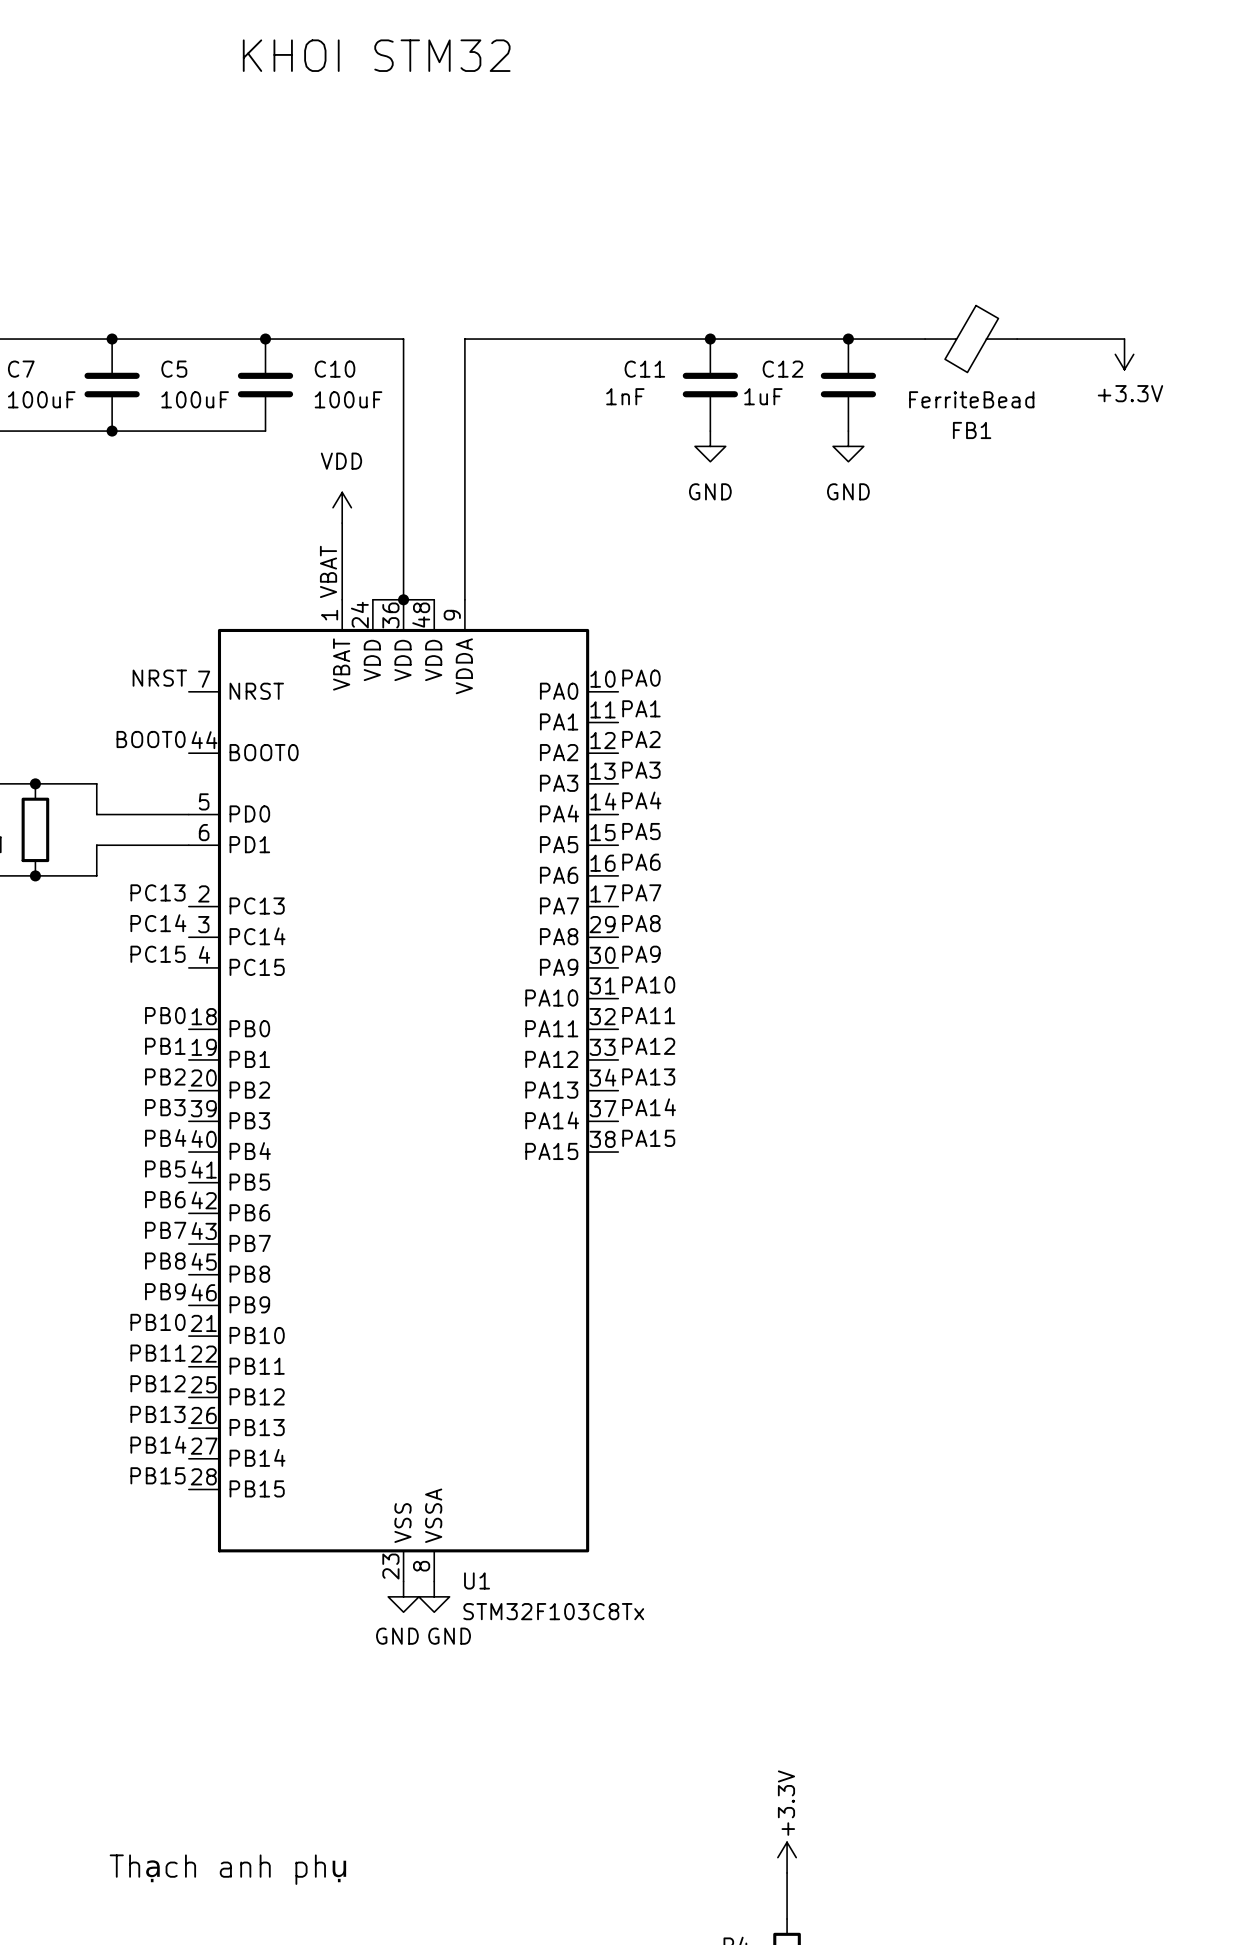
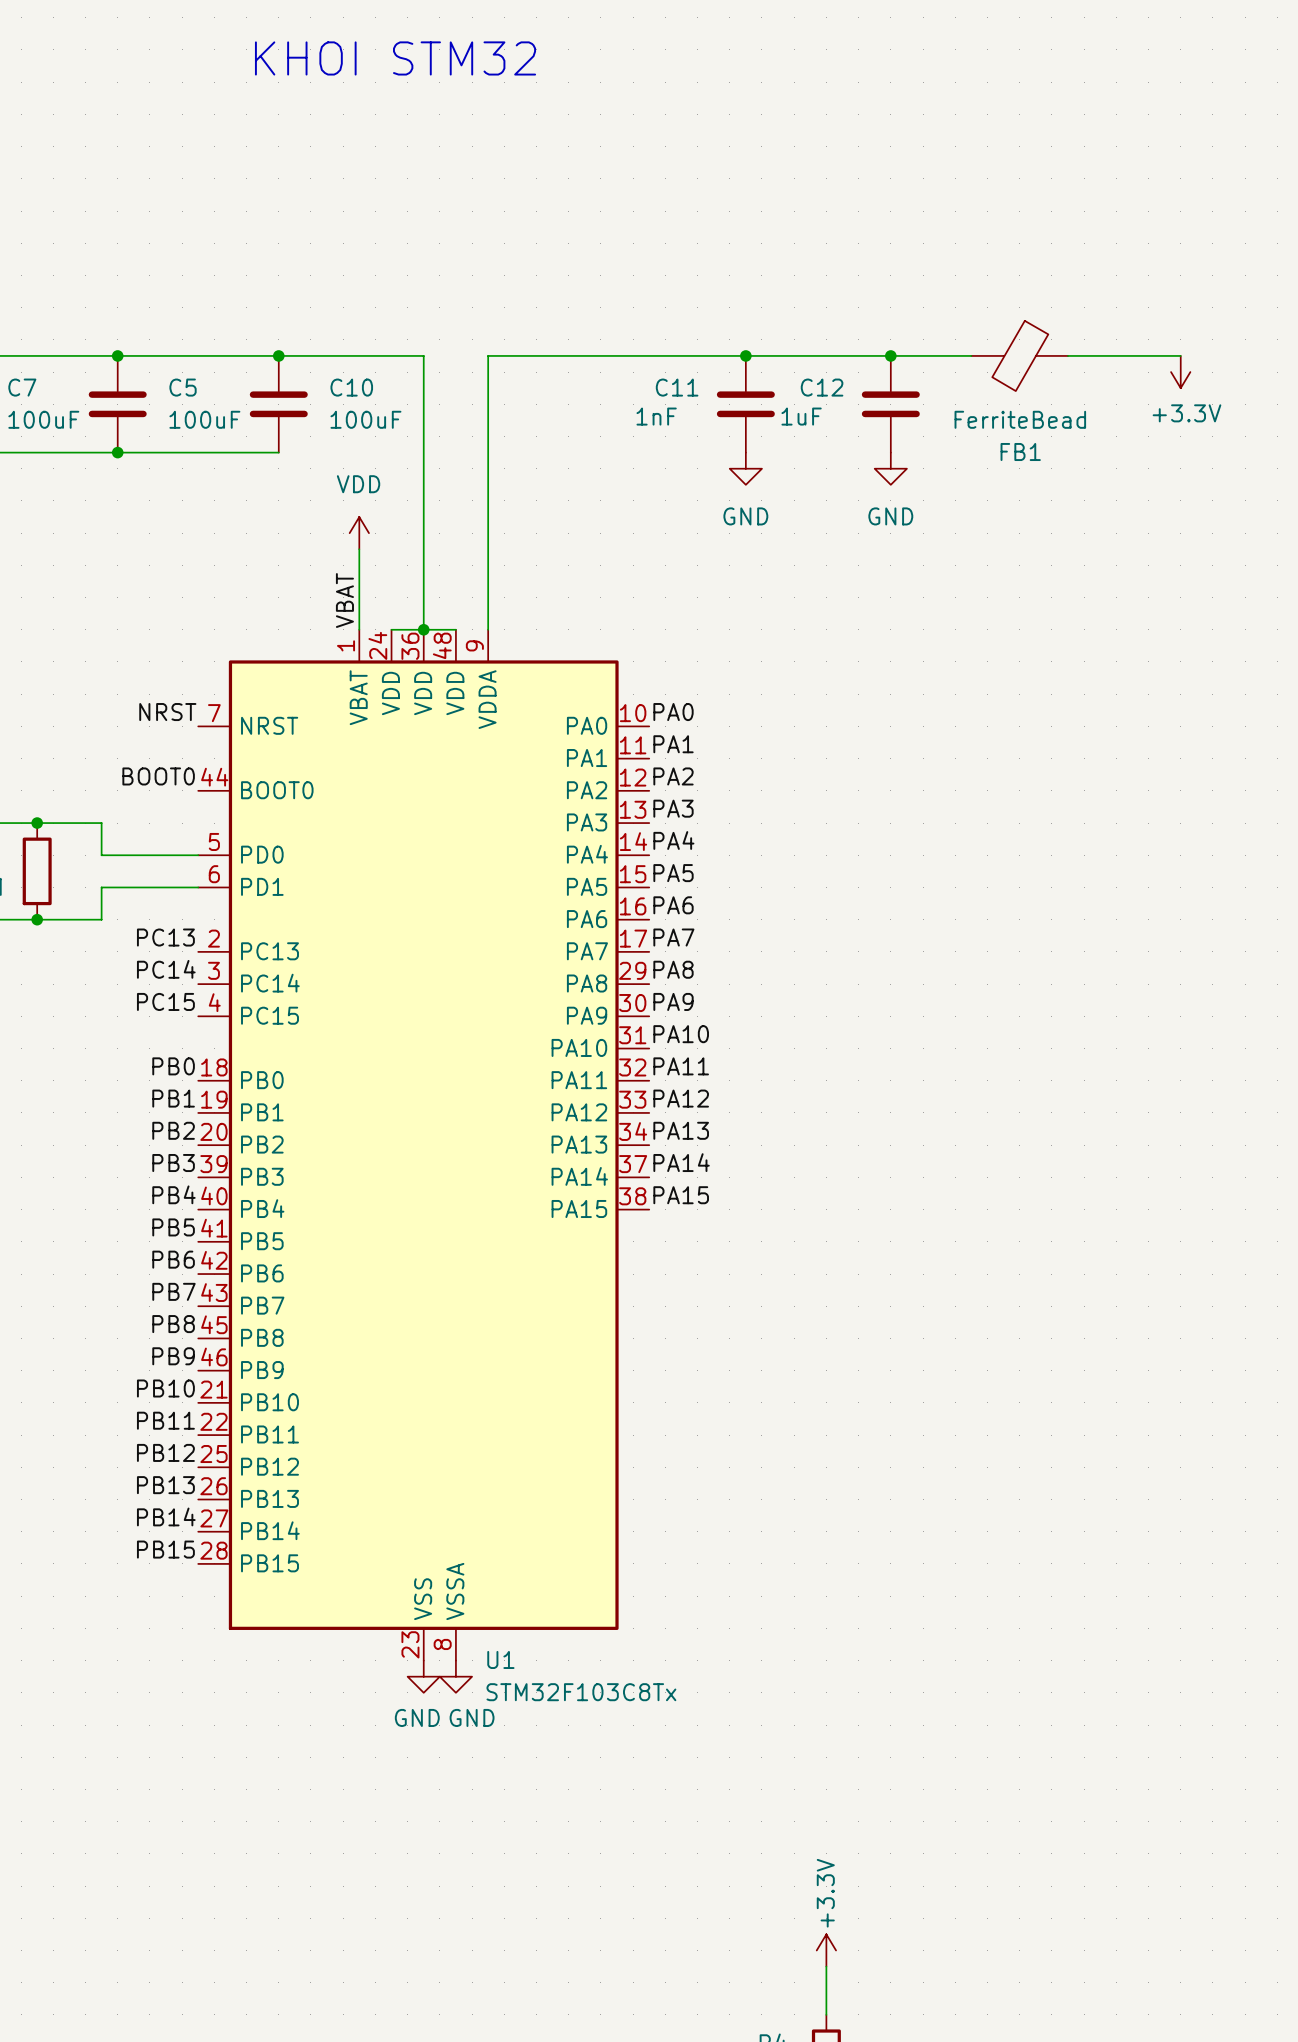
text: Thạch anh phụ (228, 1869) -> none

